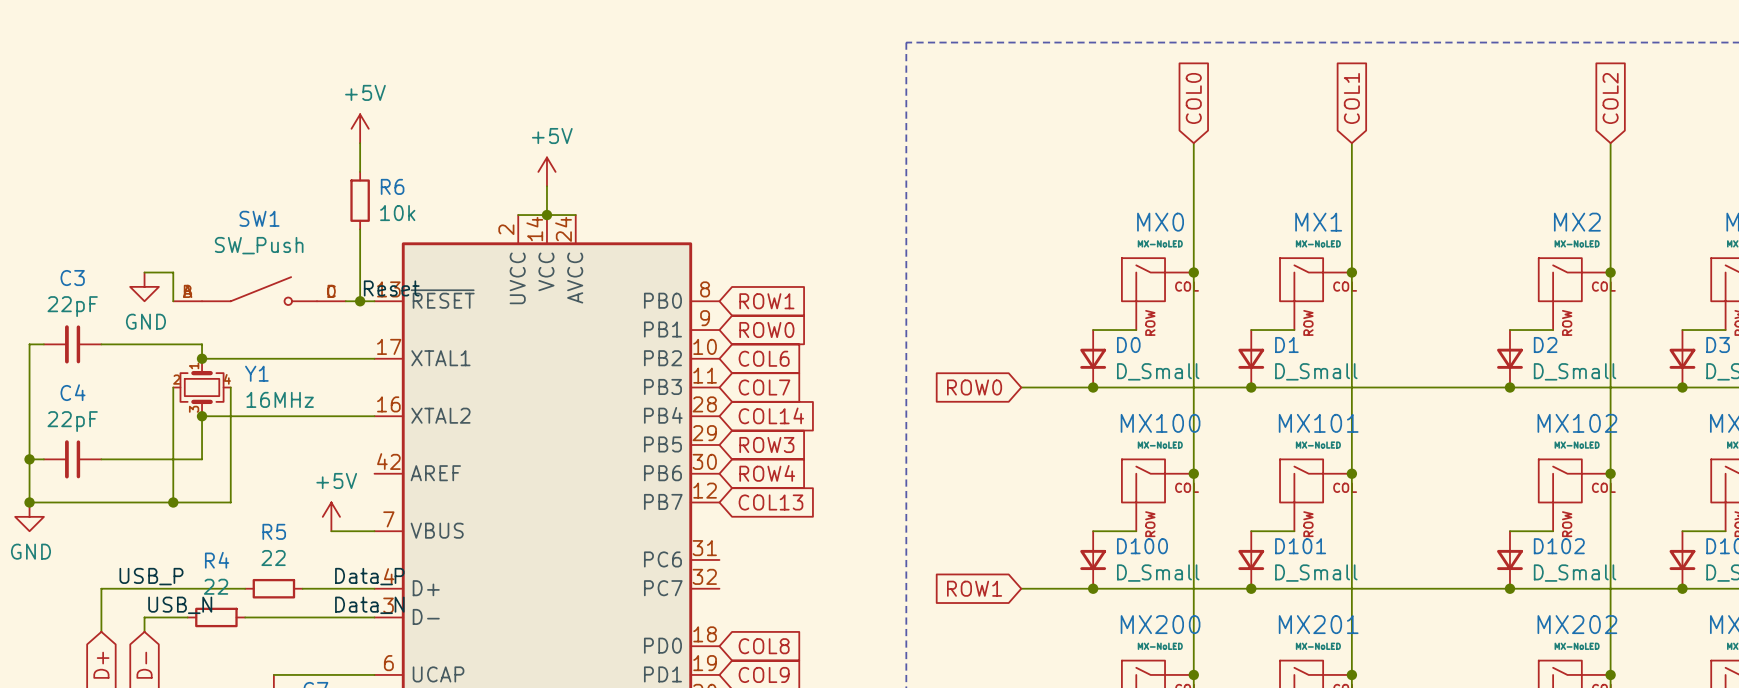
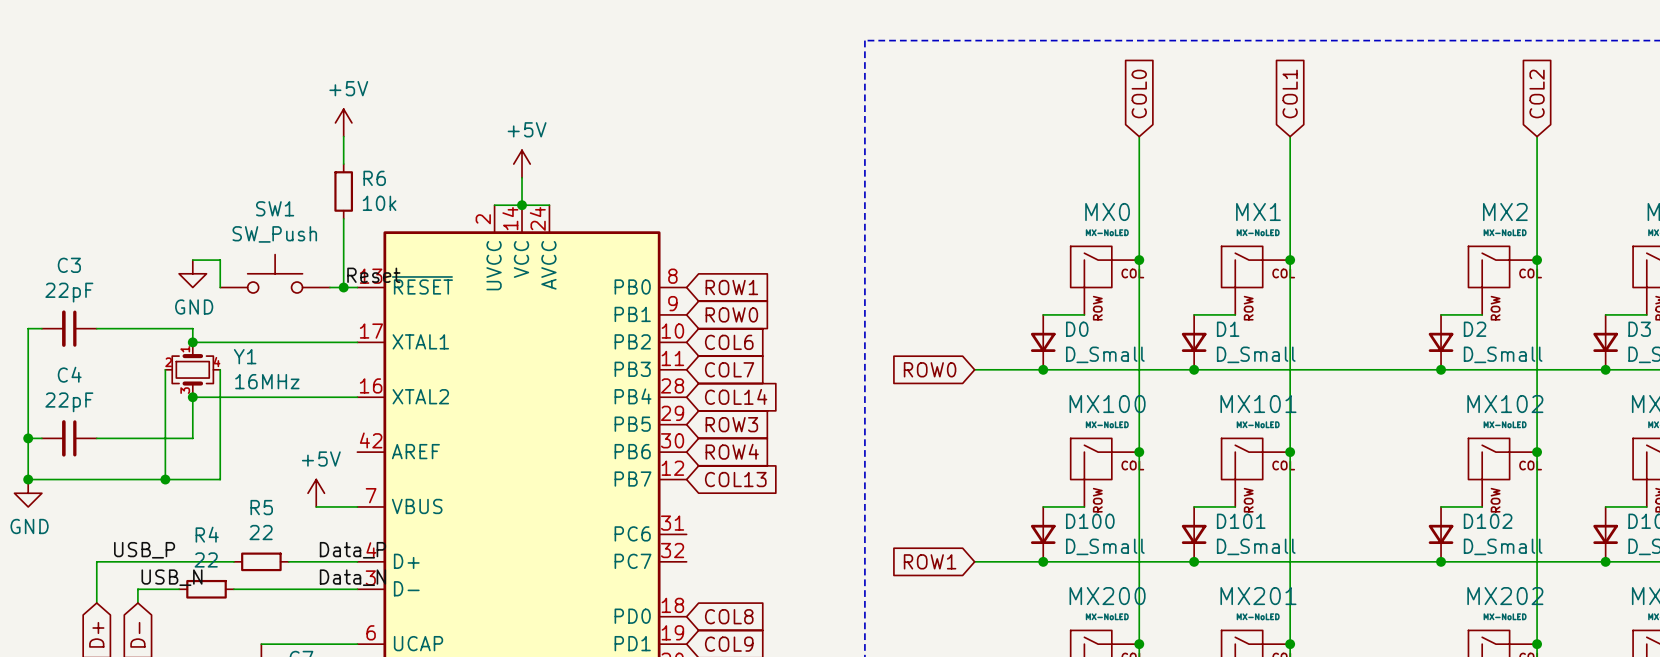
wire: (144, 272) (173, 272) (173, 301) -> (192, 260) (220, 260) (220, 287)
SW1 symbol: [173, 276, 346, 306] -> [220, 254, 330, 293]
power symbol position: GND (144, 286) -> GND (192, 273)

